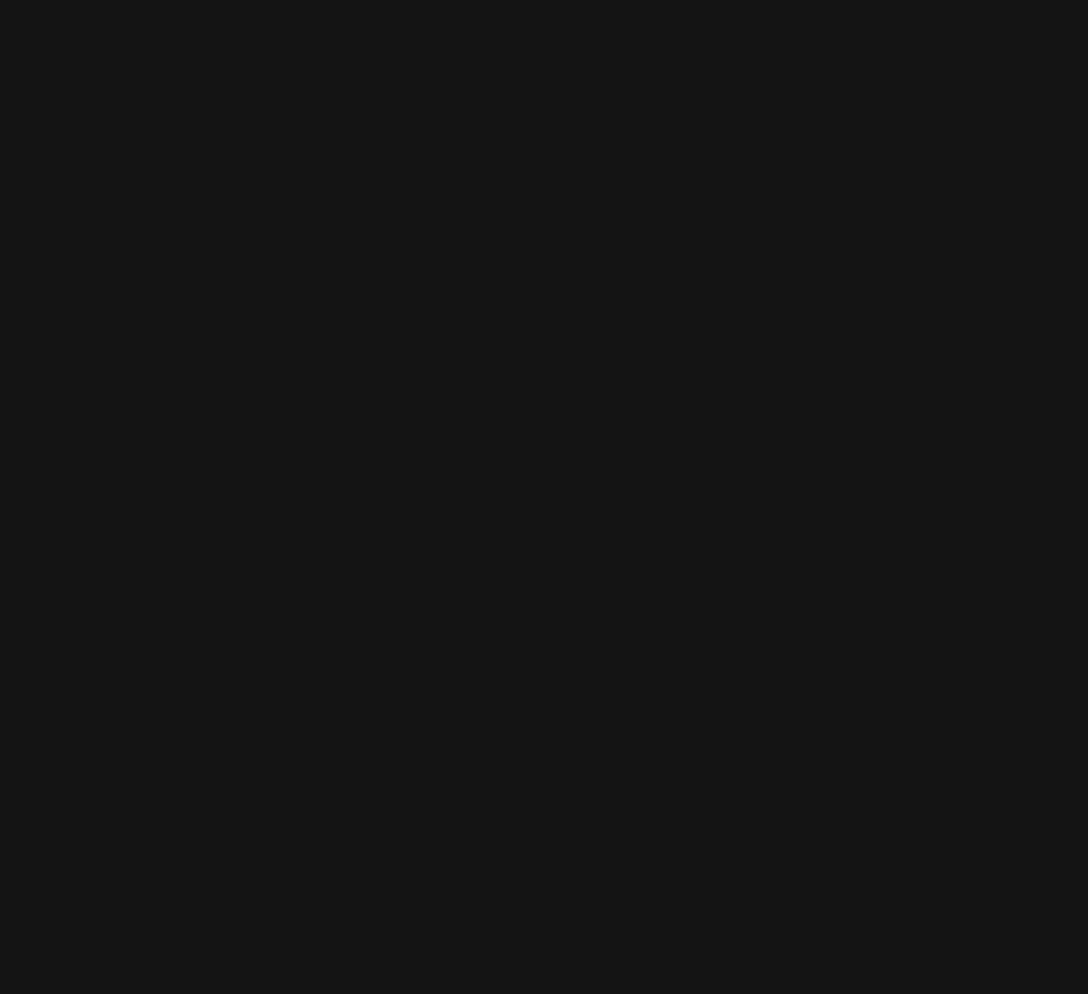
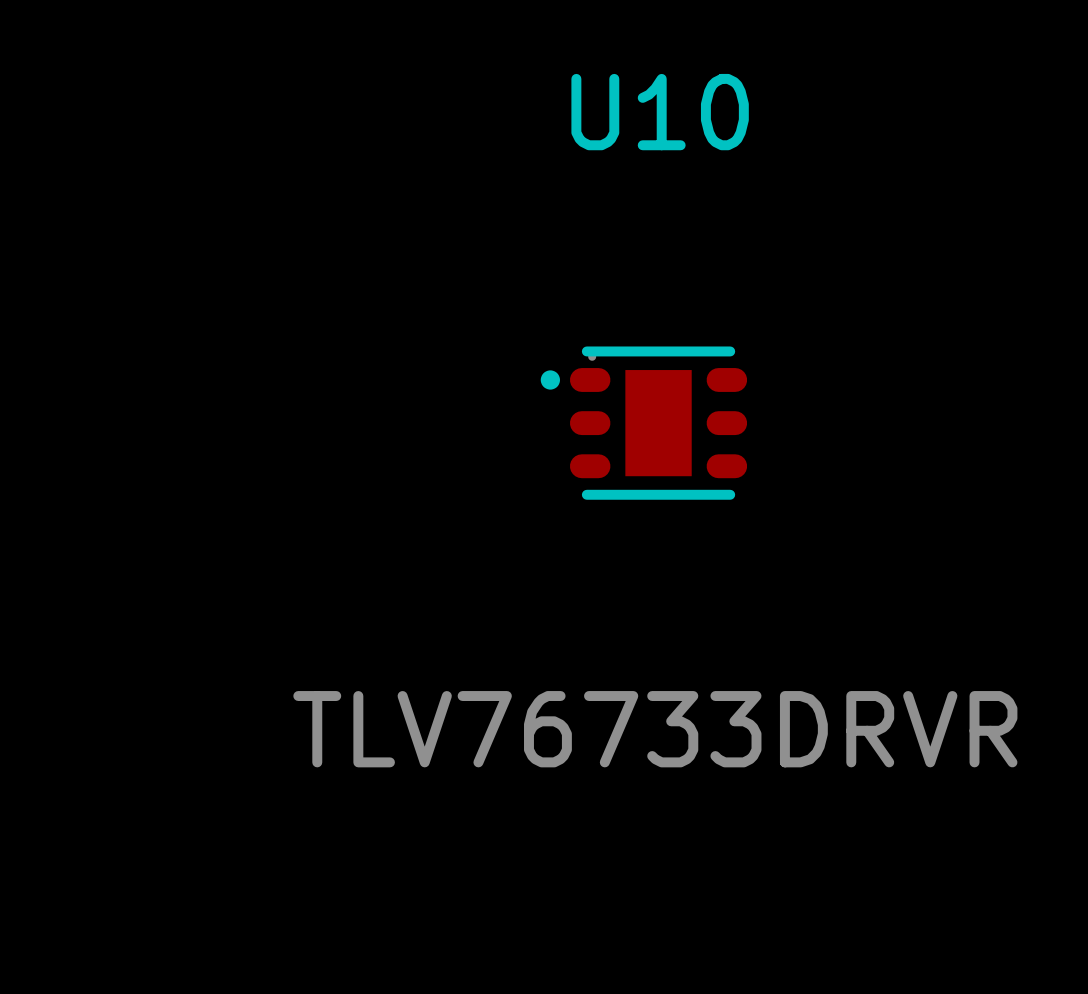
U10: none -> TLV76733DRVR (643, 423)

